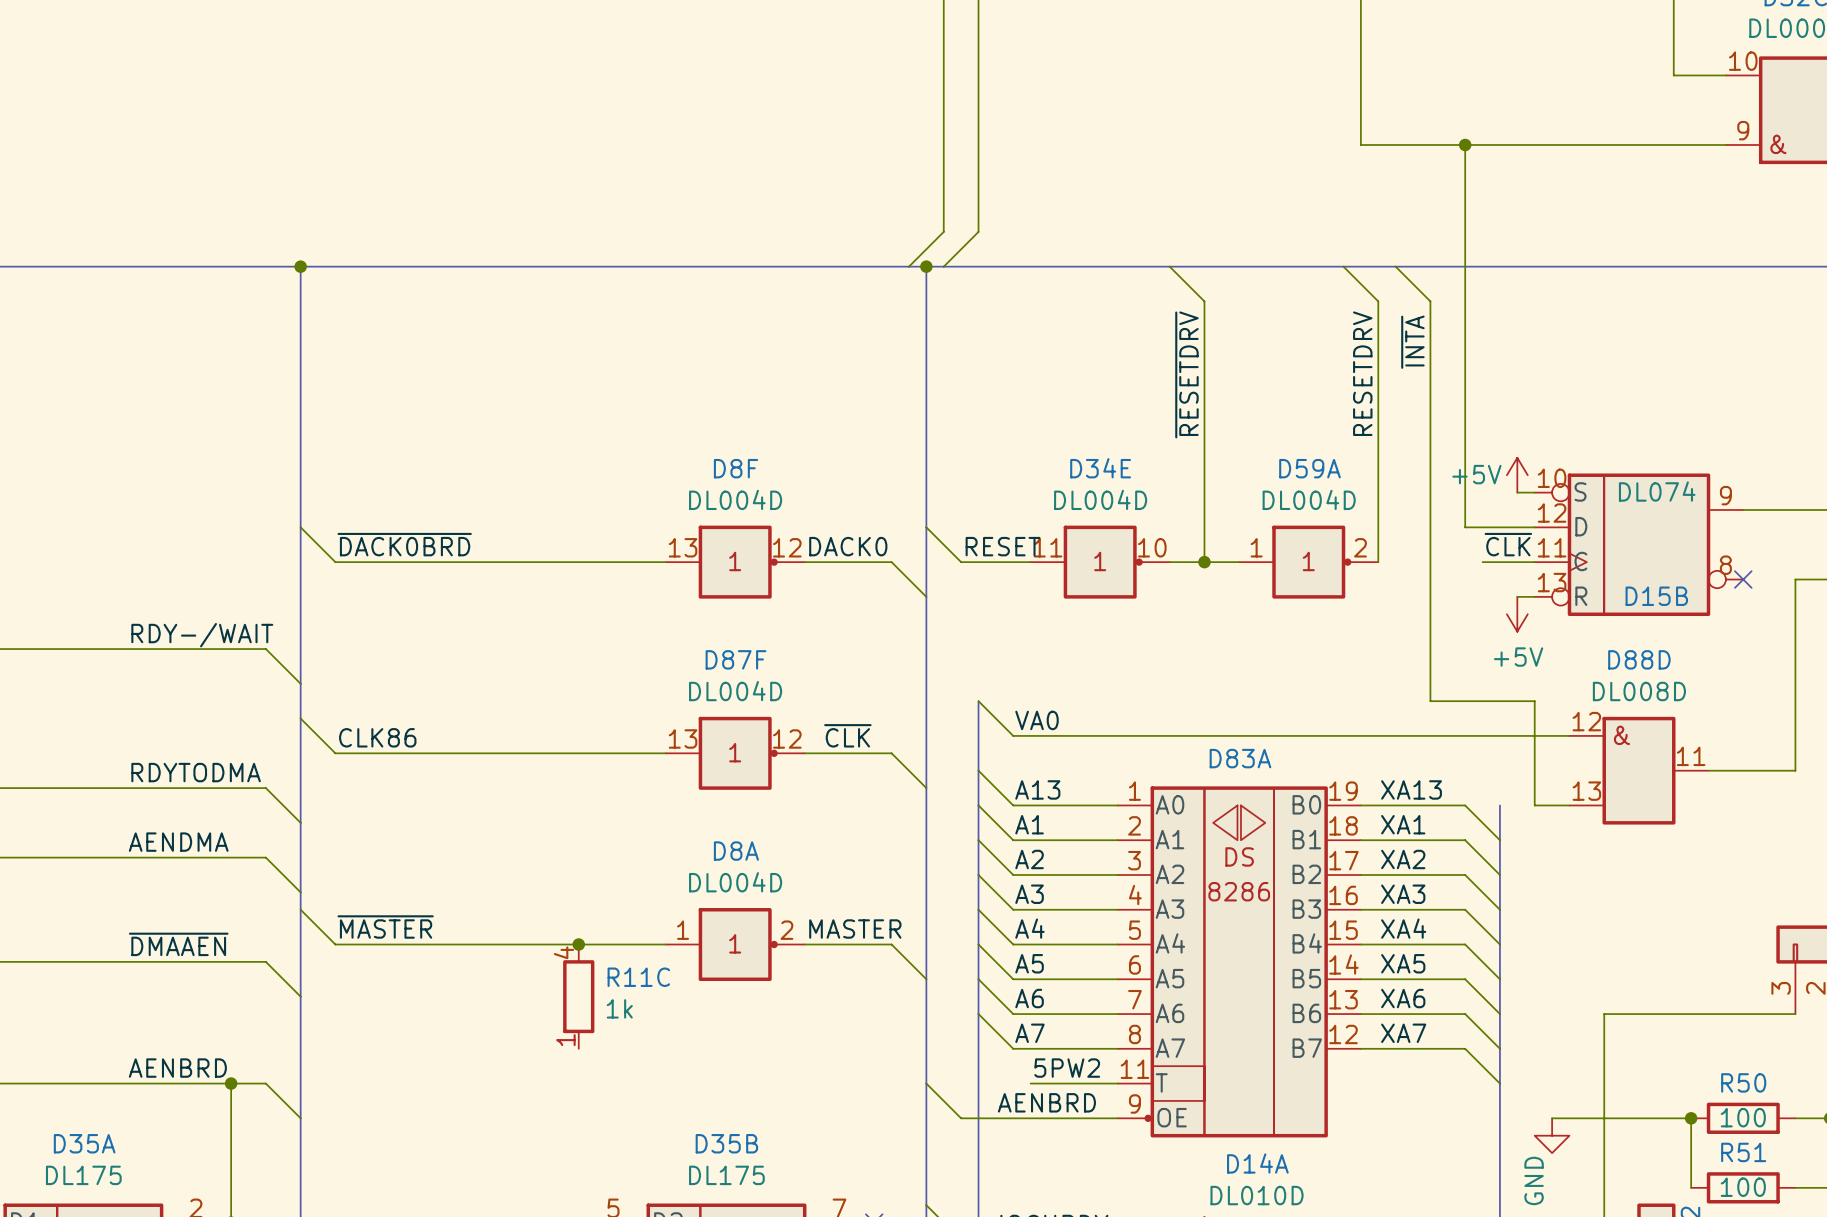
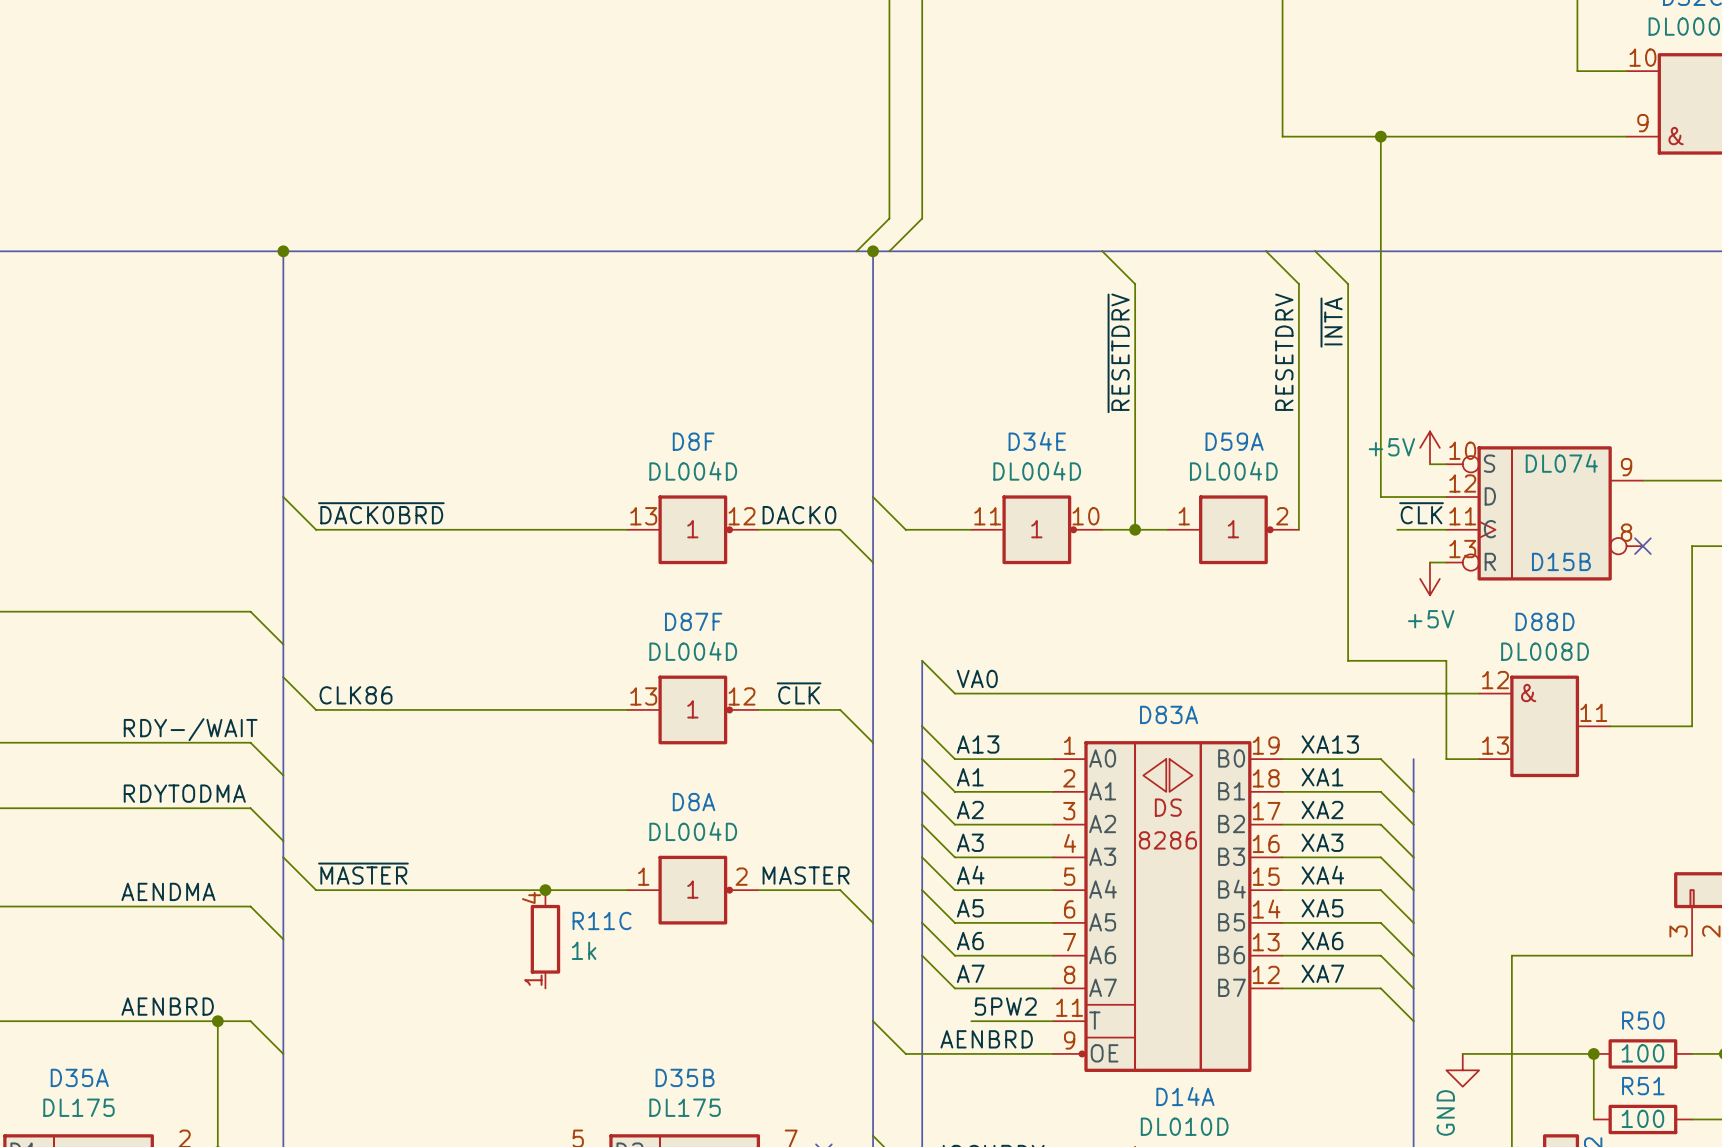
label: RESET (1003, 546) -> none
label: RDY-/WAIT (202, 635) -> none
label: RDYTODMA (196, 772) -> RDY-/WAIT (190, 729)
label: AENDMA (178, 842) -> RDYTODMA (184, 793)
label: ~{DMAAEN} (178, 944) -> AENDMA (168, 891)

